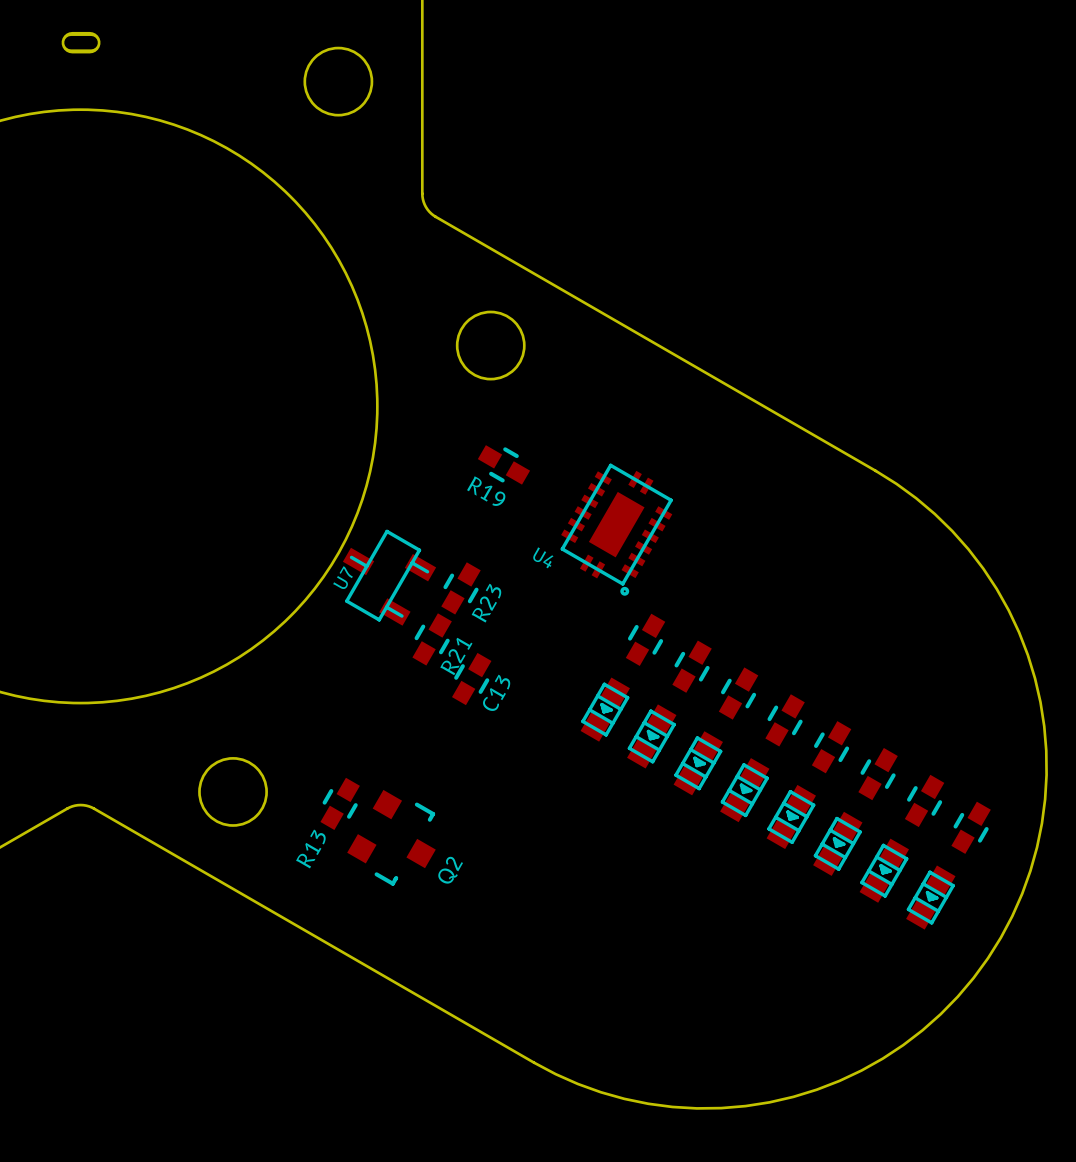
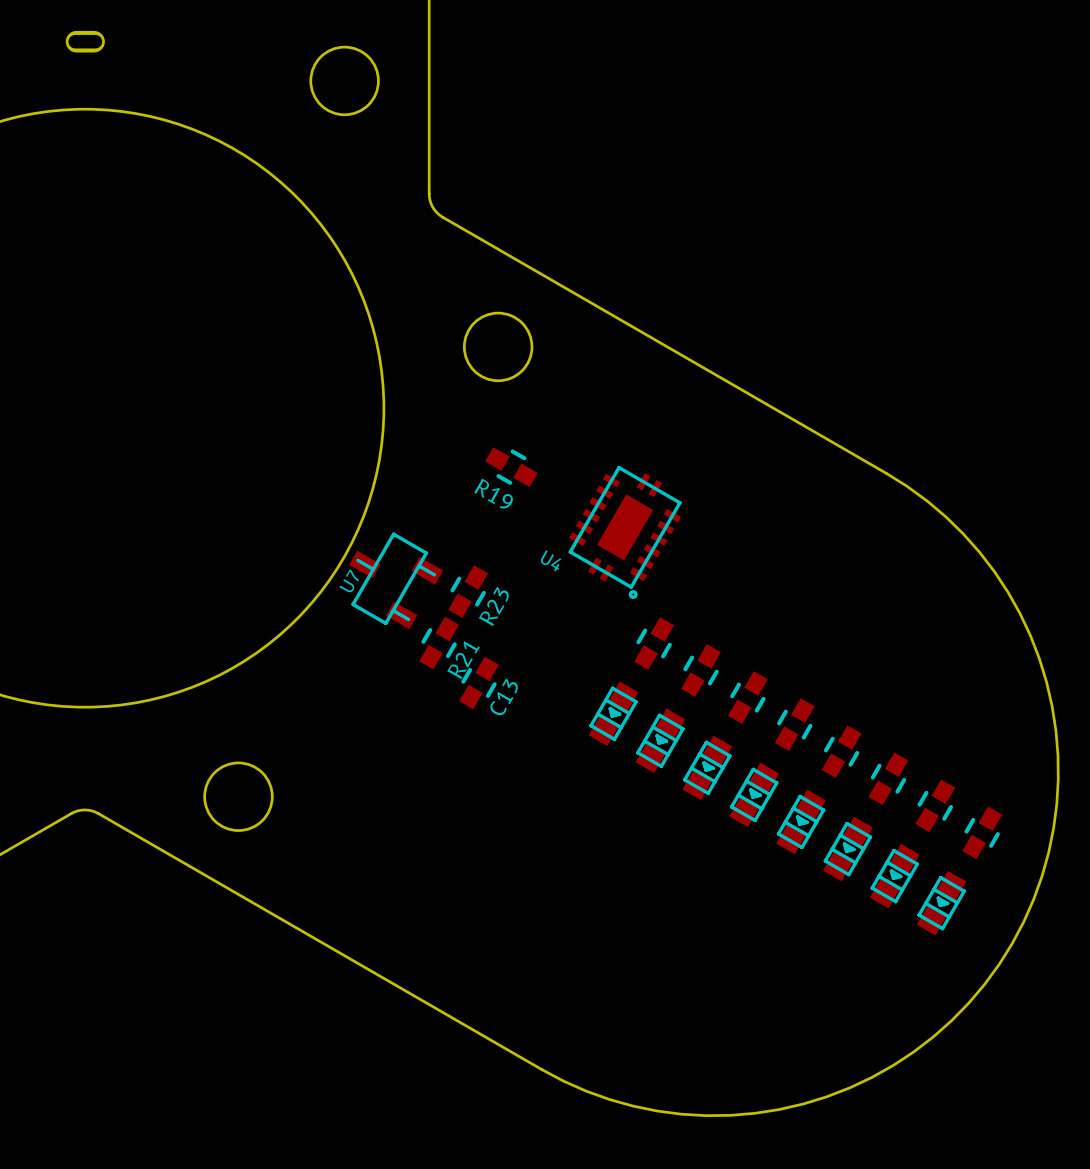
R13: (340, 803) -> none
Q2: (391, 837) -> none

